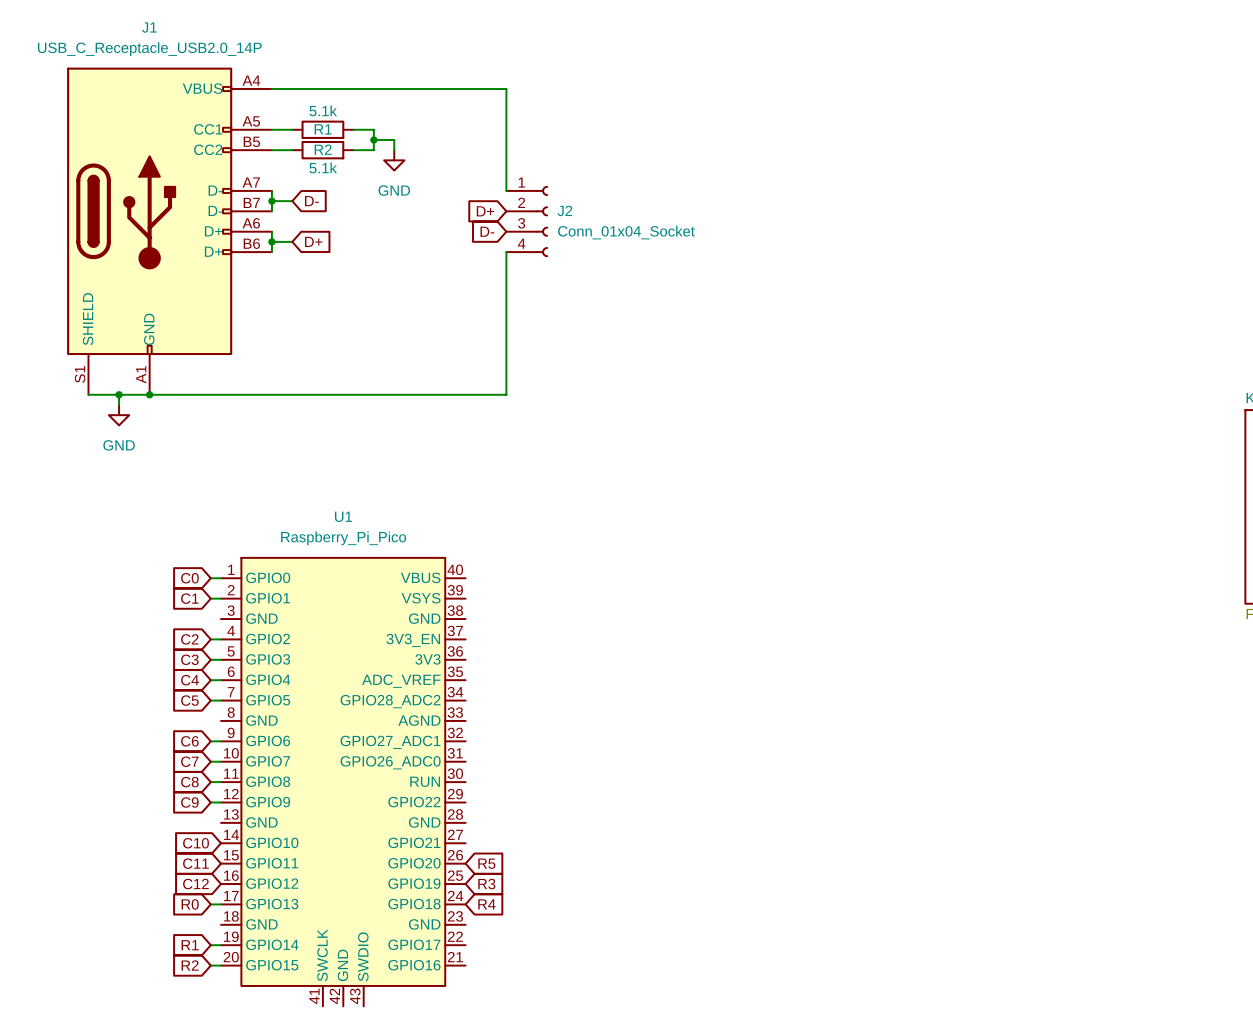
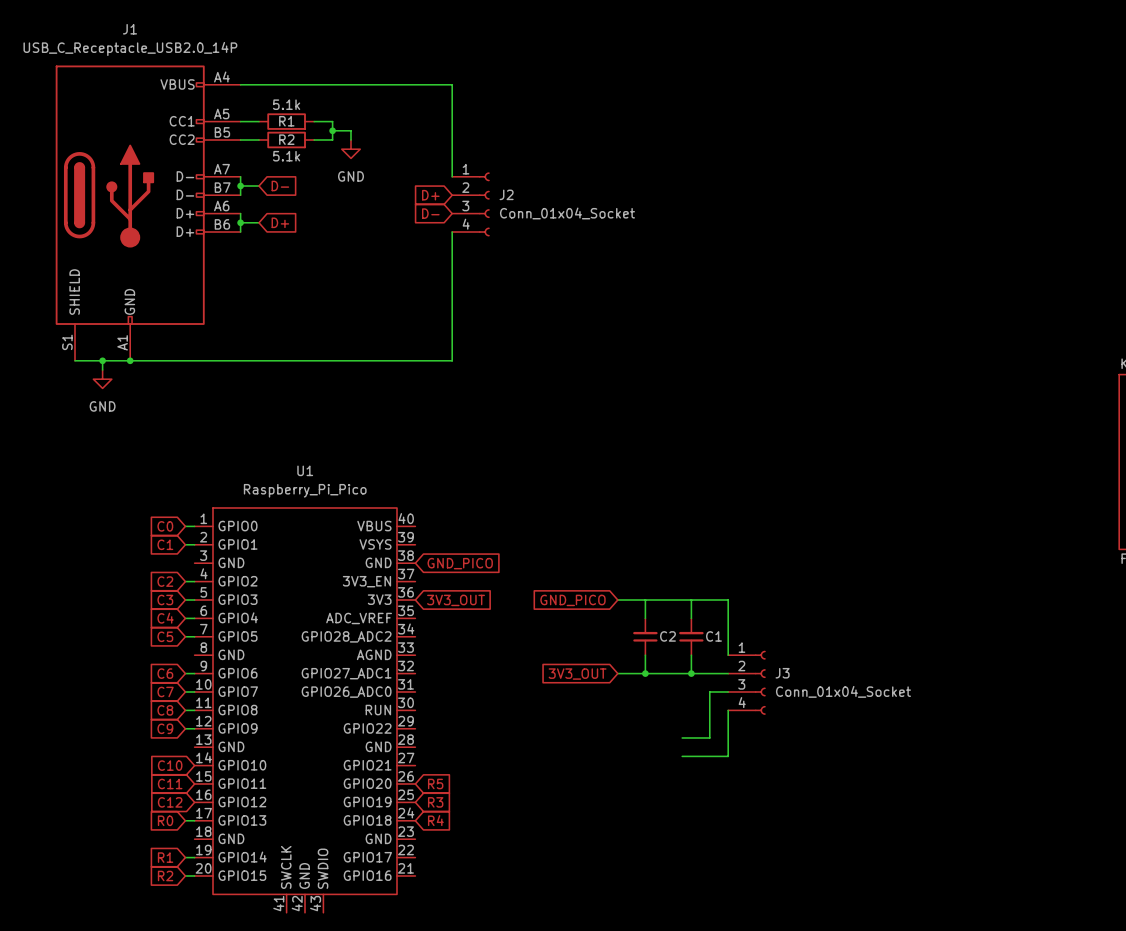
global label: none -> GND_PICO (460, 563)
wire: none -> (617, 599) (728, 599) (728, 655)
wire: none -> (645, 599) (645, 618)
wire: none -> (691, 599) (691, 618)
global label: none -> 3V3_OUT (456, 600)
global label: none -> GND_PICO (572, 600)
C2: none -> (645, 636)
C1: none -> (691, 636)
wire: none -> (645, 655) (645, 673)
wire: none -> (691, 655) (691, 673)
wire: none -> (617, 673) (728, 673)
junction: none -> (645, 673)
junction: none -> (691, 673)
global label: none -> 3V3_OUT (577, 674)
J3: none -> Conn_01x04_Socket (746, 682)
wire: none -> (728, 691) (709, 691) (709, 737) (682, 737)
wire: none -> (728, 710) (728, 756) (682, 756)

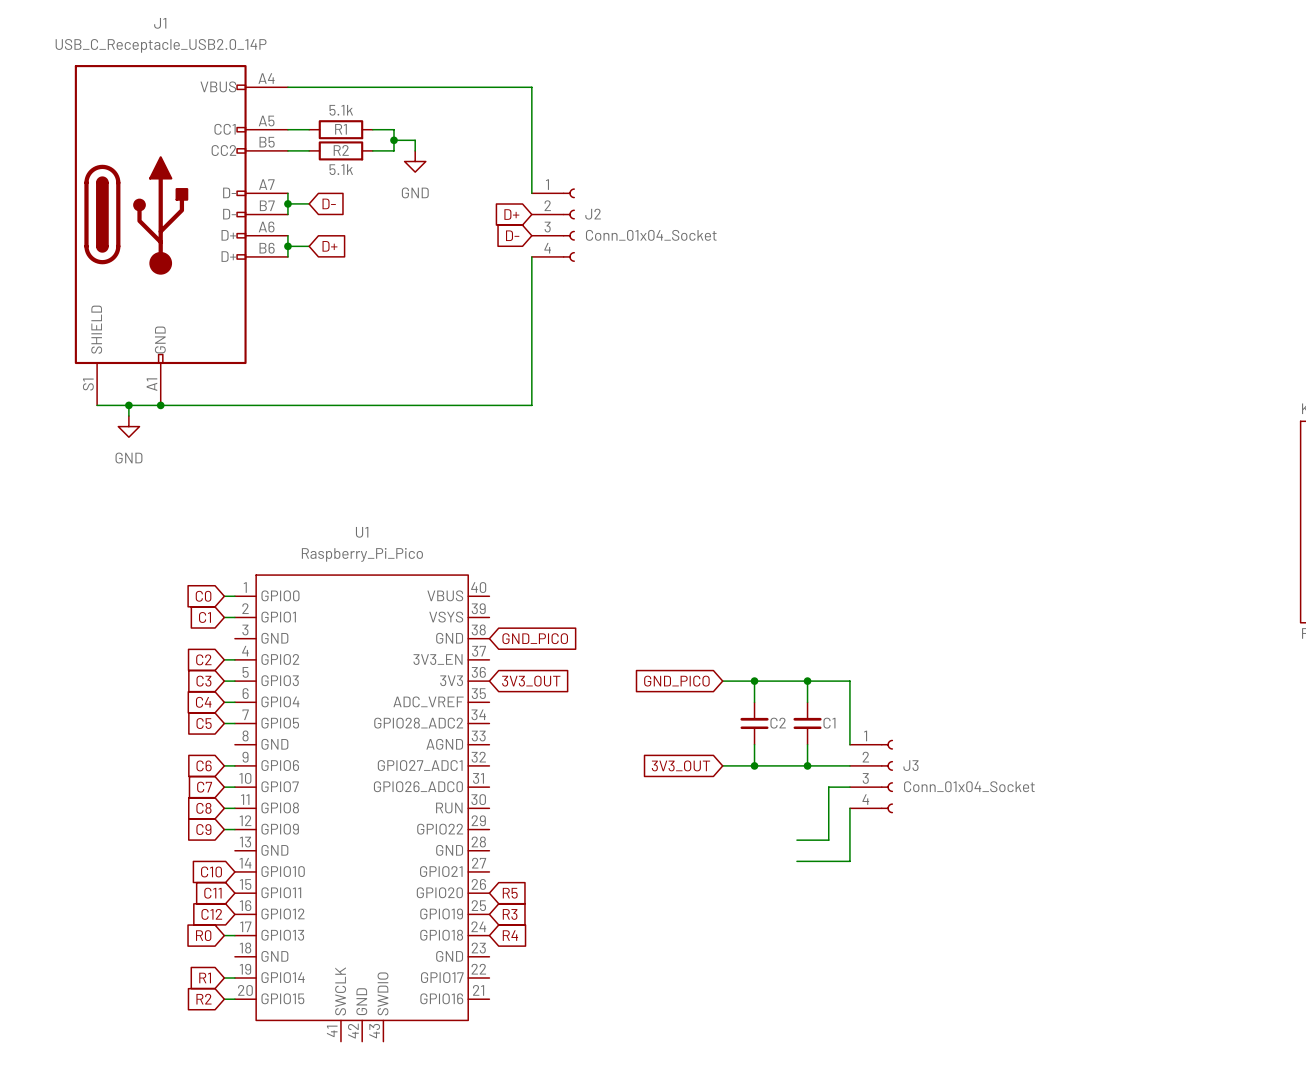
junction: none -> (754, 681)
junction: none -> (807, 681)

